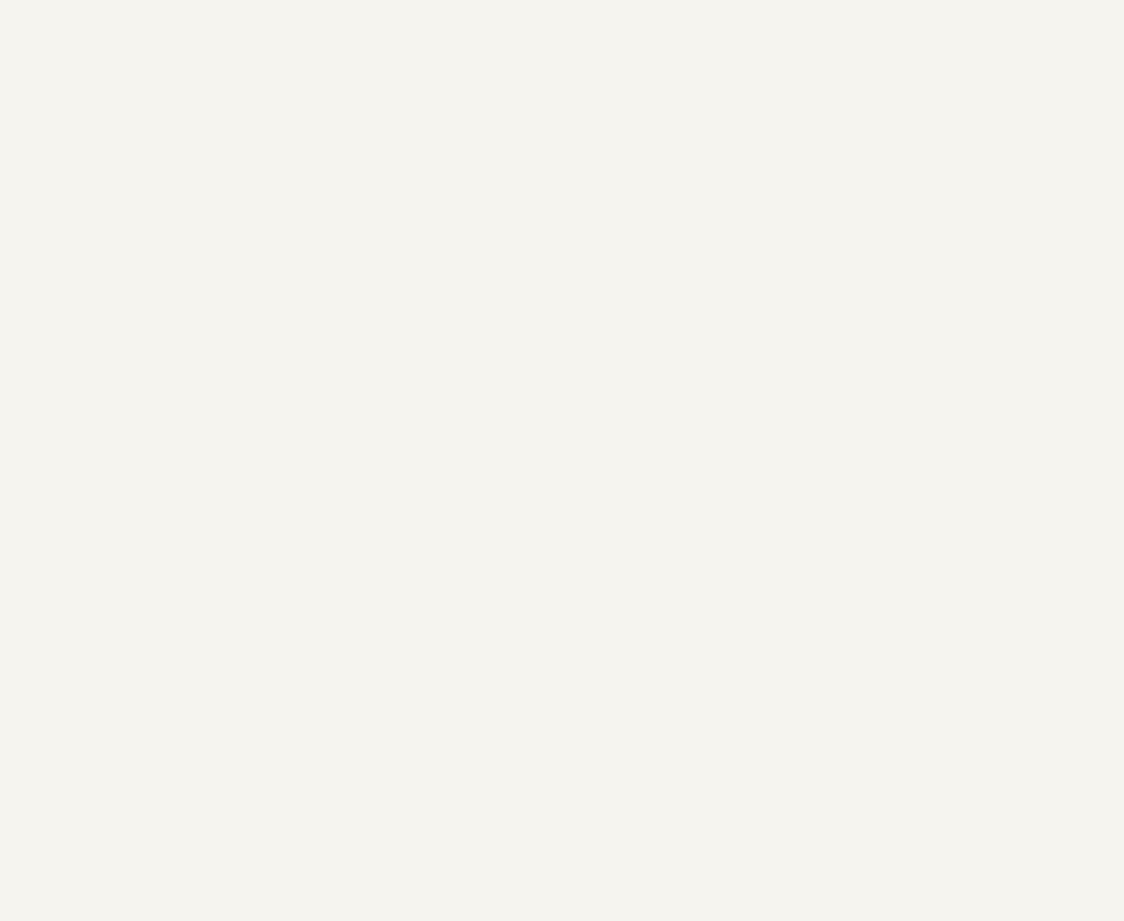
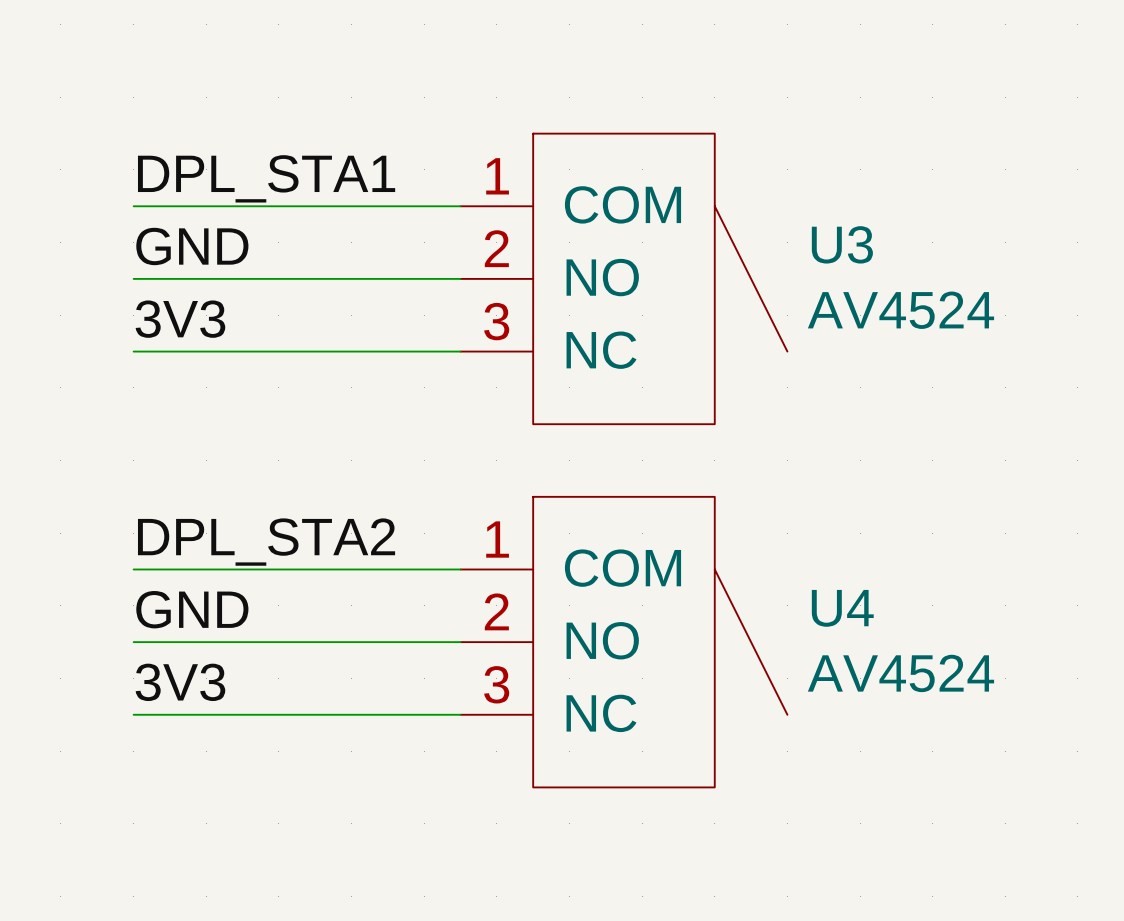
label: none -> DPL_STA1 (266, 178)
wire: none -> (133, 206) (460, 206)
label: none -> GND (192, 246)
wire: none -> (133, 278) (460, 278)
U3: none -> AV4524 (623, 278)
label: none -> 3V3 (180, 319)
wire: none -> (133, 351) (460, 351)
label: none -> DPL_STA2 (266, 542)
wire: none -> (133, 569) (460, 569)
label: none -> GND (192, 609)
wire: none -> (133, 642) (460, 642)
U4: none -> AV4524 (623, 642)
label: none -> 3V3 (180, 682)
wire: none -> (133, 714) (460, 714)

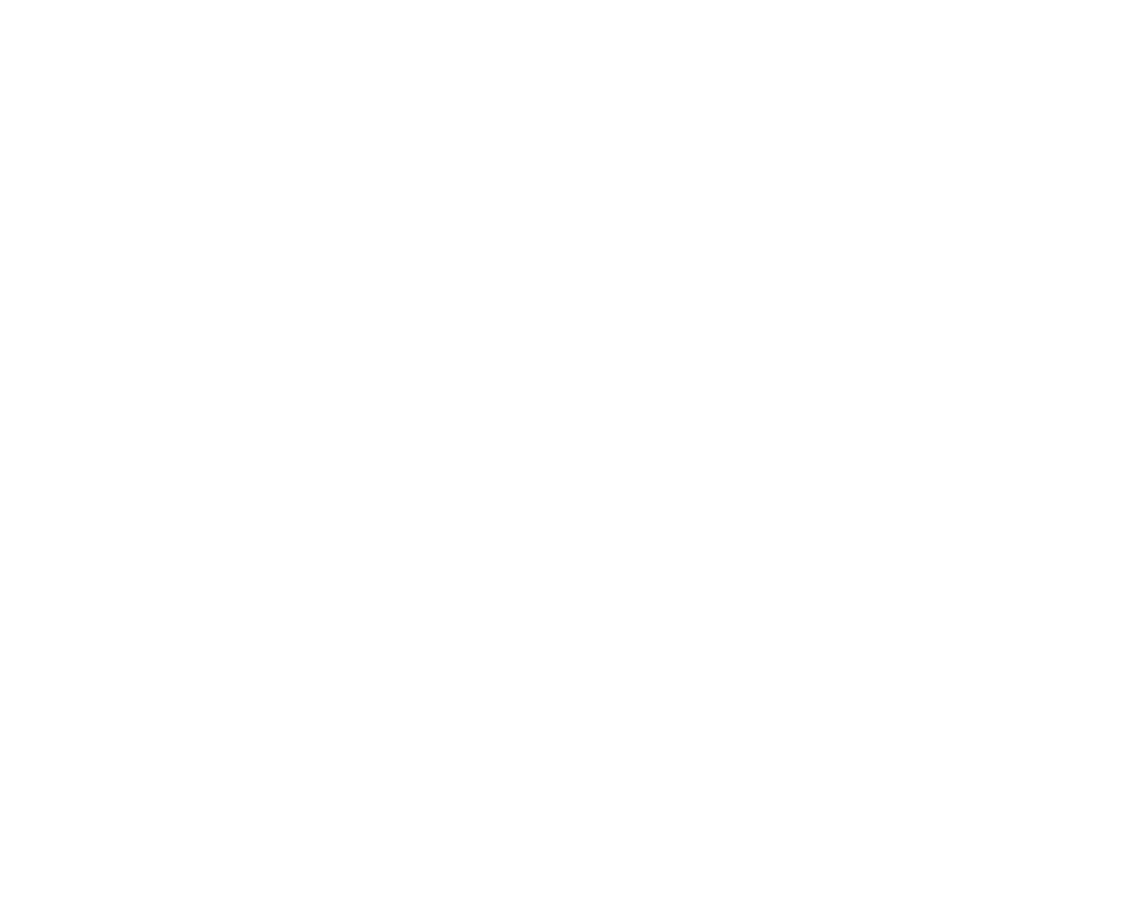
label: DPL_STA1 (266, 178) -> none
wire: (133, 206) (460, 206) -> none
label: GND (192, 246) -> none
wire: (133, 278) (460, 278) -> none
U3: AV4524 (623, 278) -> none
label: 3V3 (180, 319) -> none
wire: (133, 351) (460, 351) -> none
label: DPL_STA2 (266, 542) -> none
wire: (133, 569) (460, 569) -> none
label: GND (192, 609) -> none
wire: (133, 642) (460, 642) -> none
U4: AV4524 (623, 642) -> none
label: 3V3 (180, 682) -> none
wire: (133, 714) (460, 714) -> none

